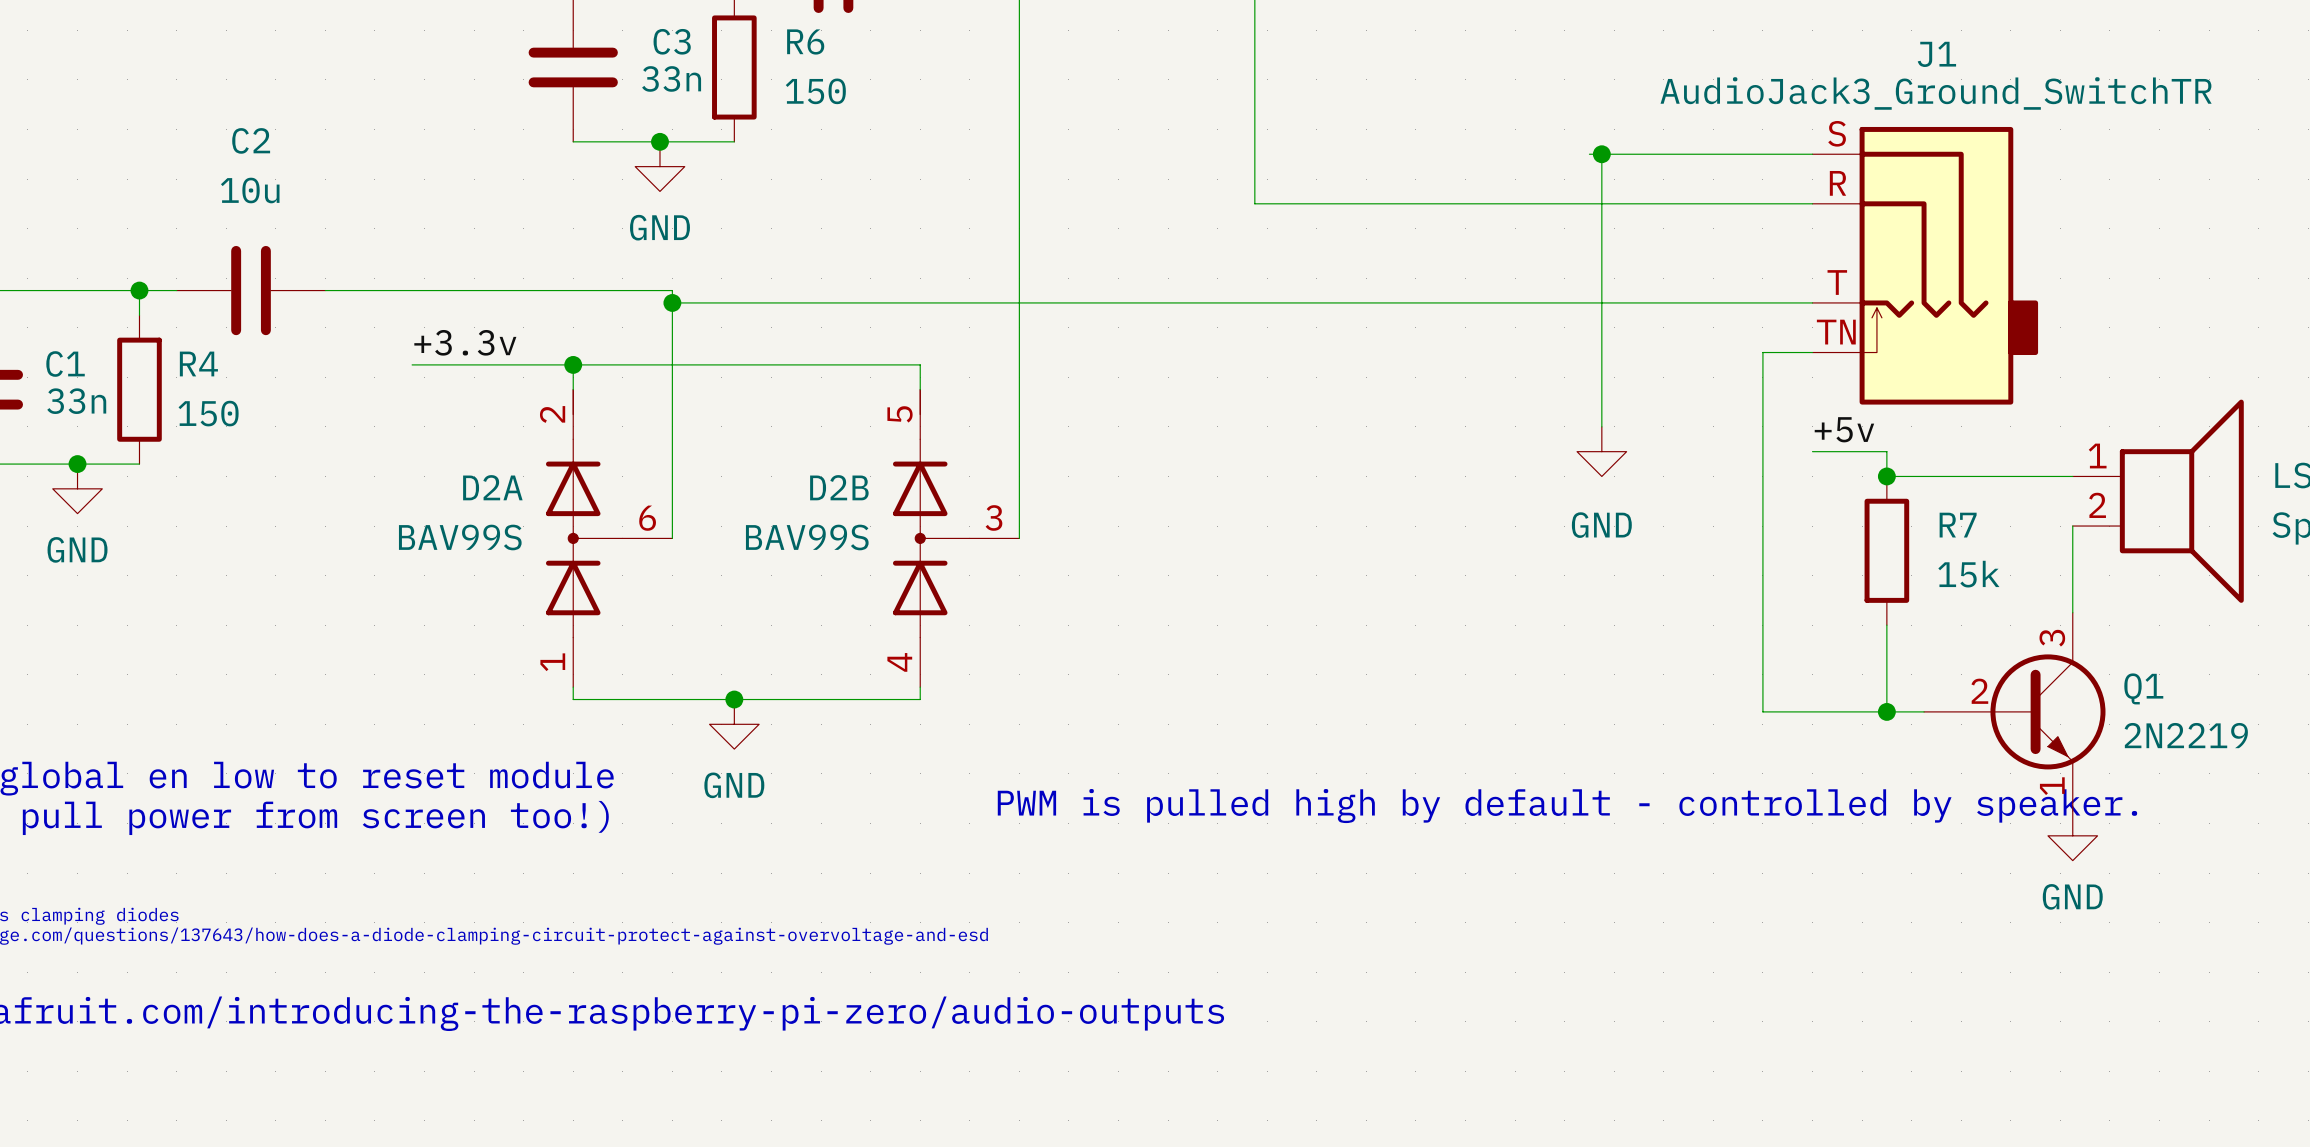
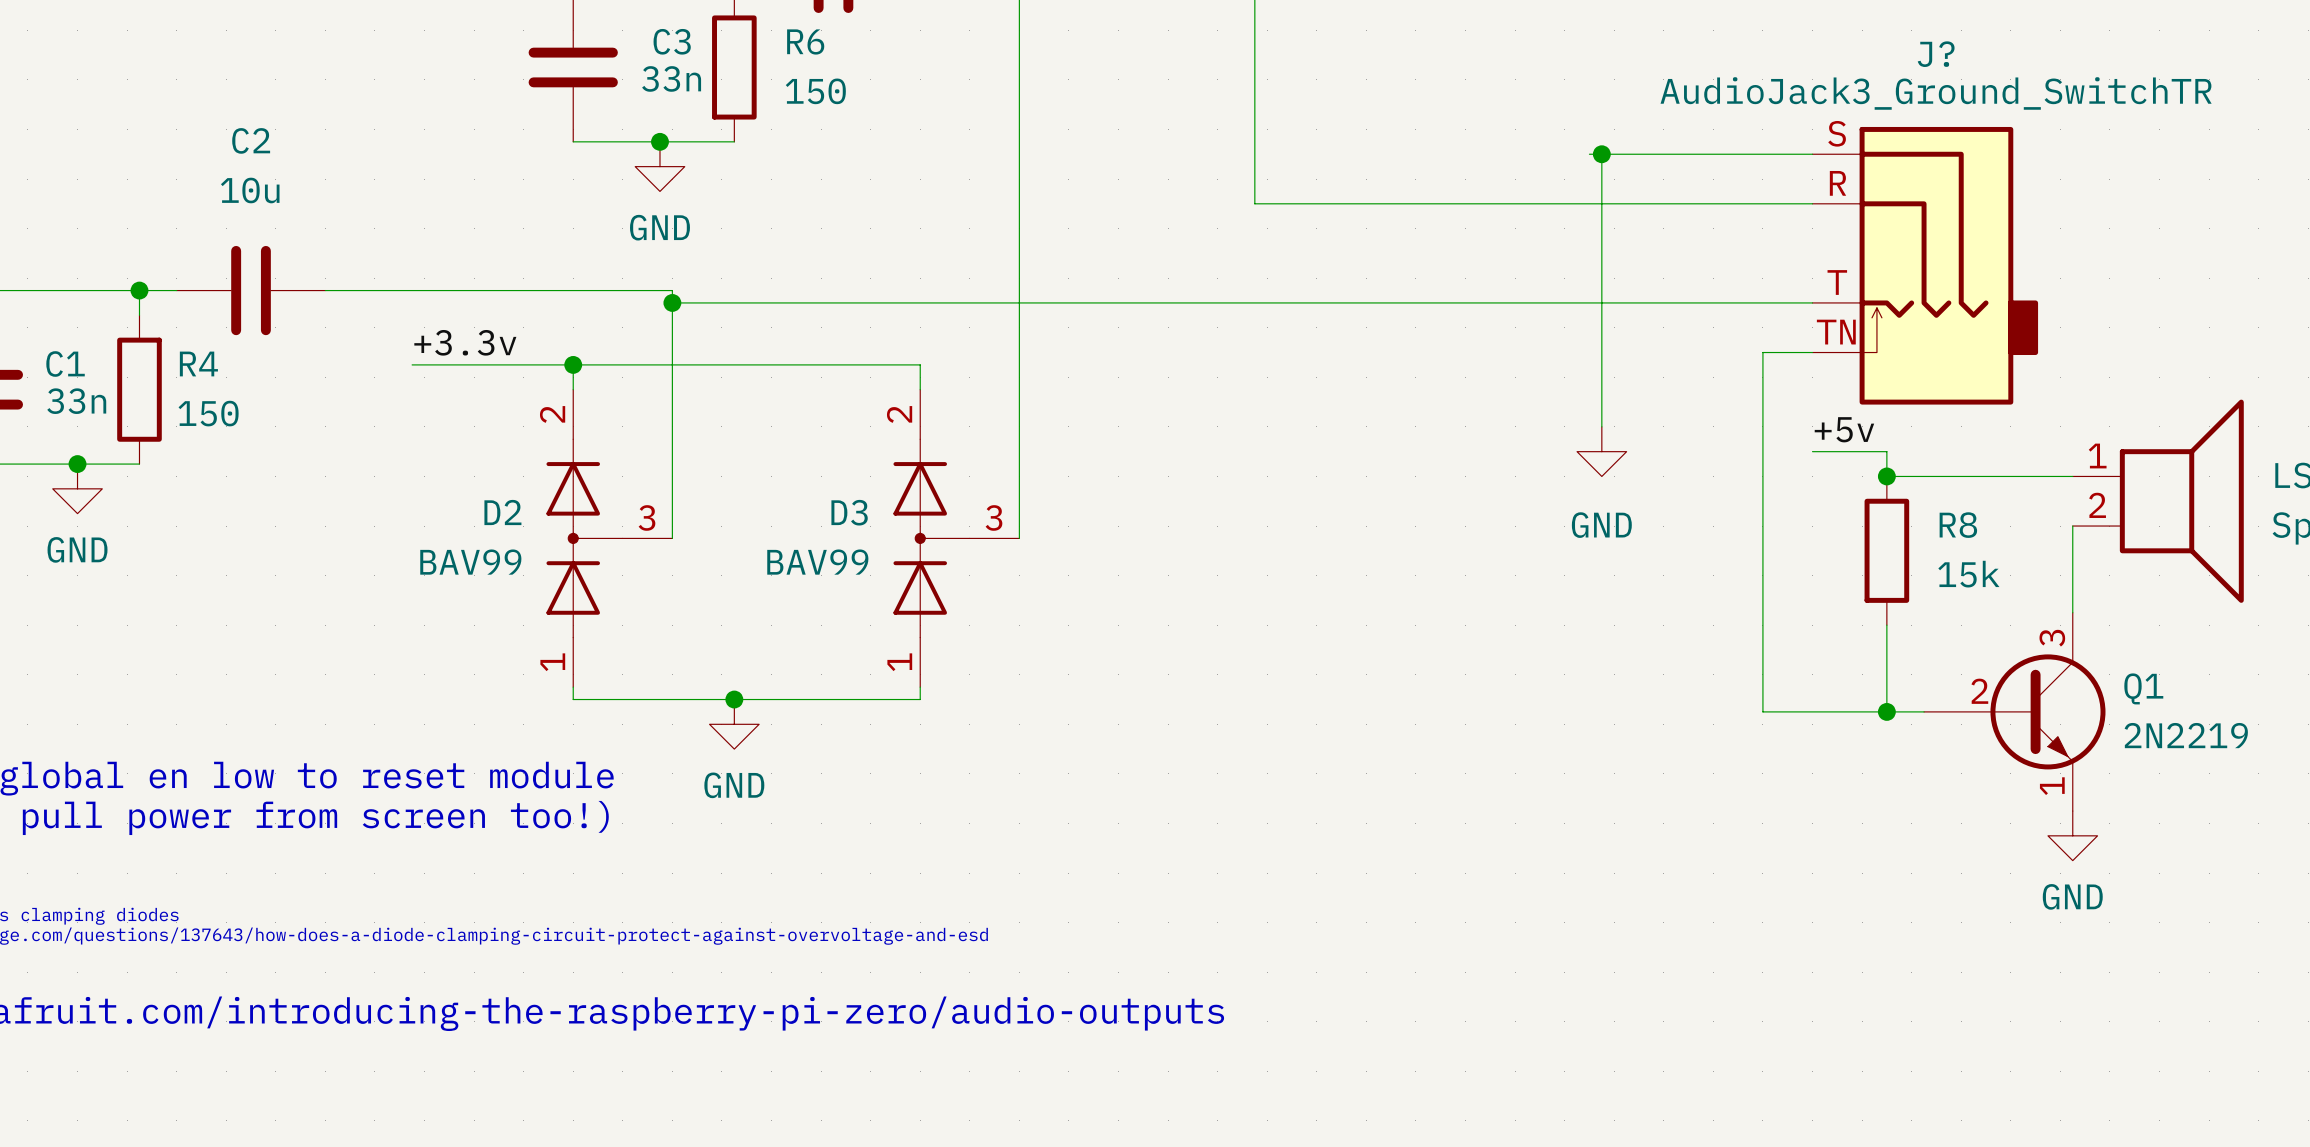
J1 name: J1 (1936, 54) -> J? (1936, 54)
R7 name: R7 (1958, 525) -> R8 (1958, 525)
D2A: BAV99S (609, 538) -> none
D2: none -> BAV99 (609, 538)
D2B: BAV99S (956, 538) -> none
D3: none -> BAV99 (956, 538)
text: PWM is pulled high by default - controlled by speaker. (1567, 806) -> none

